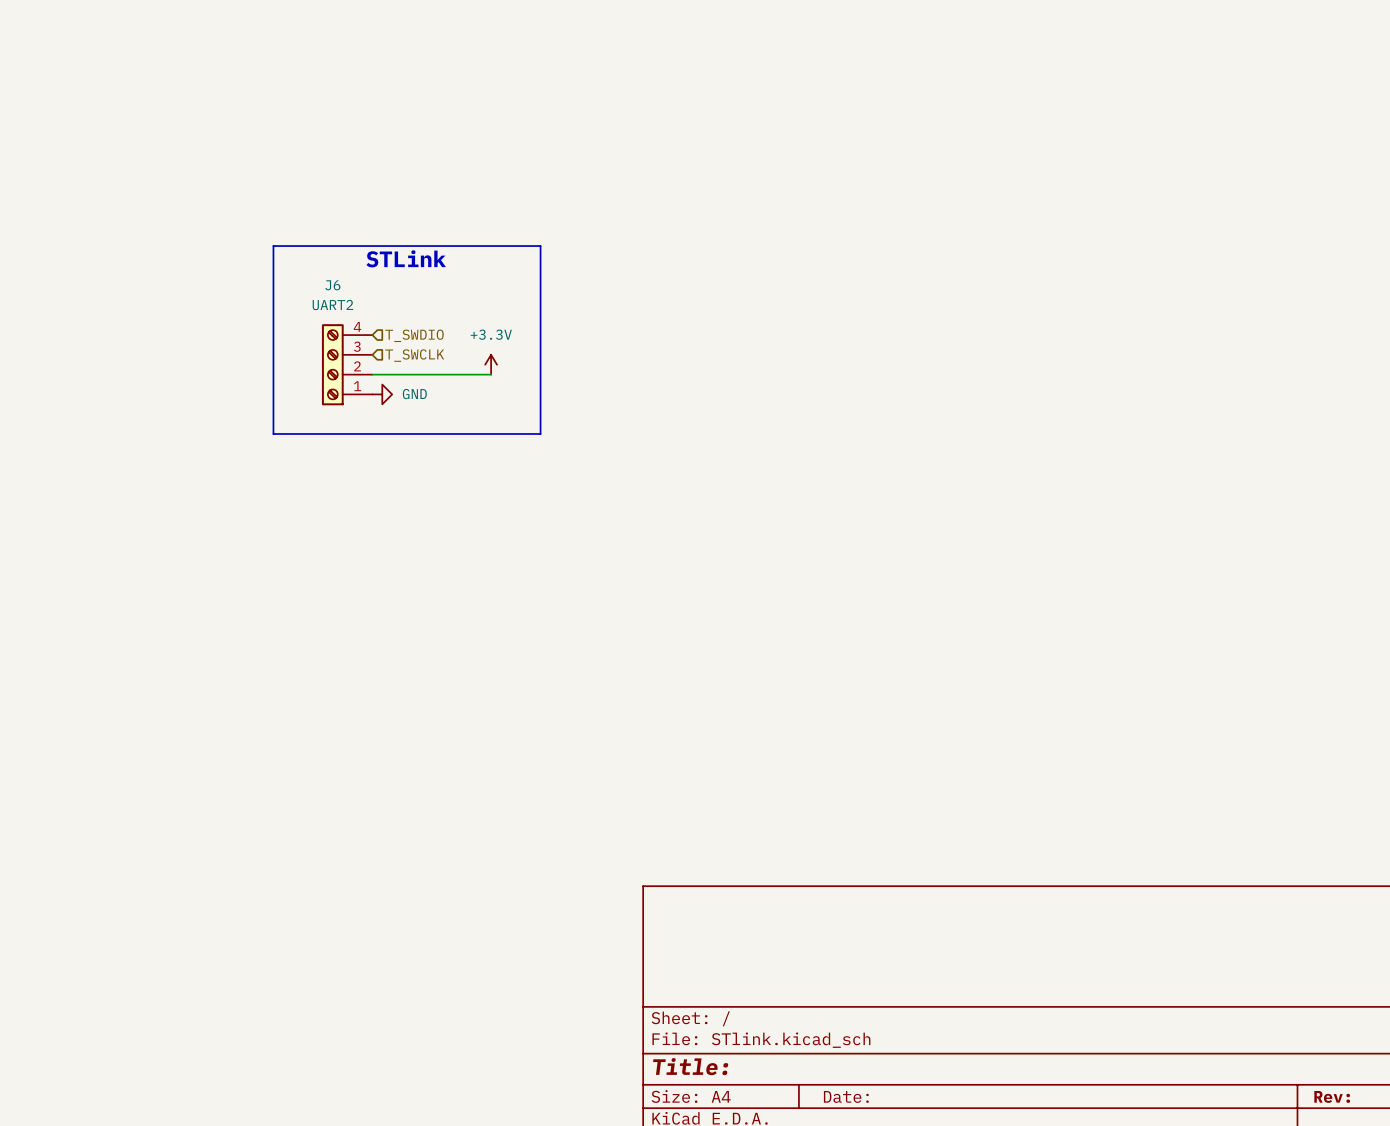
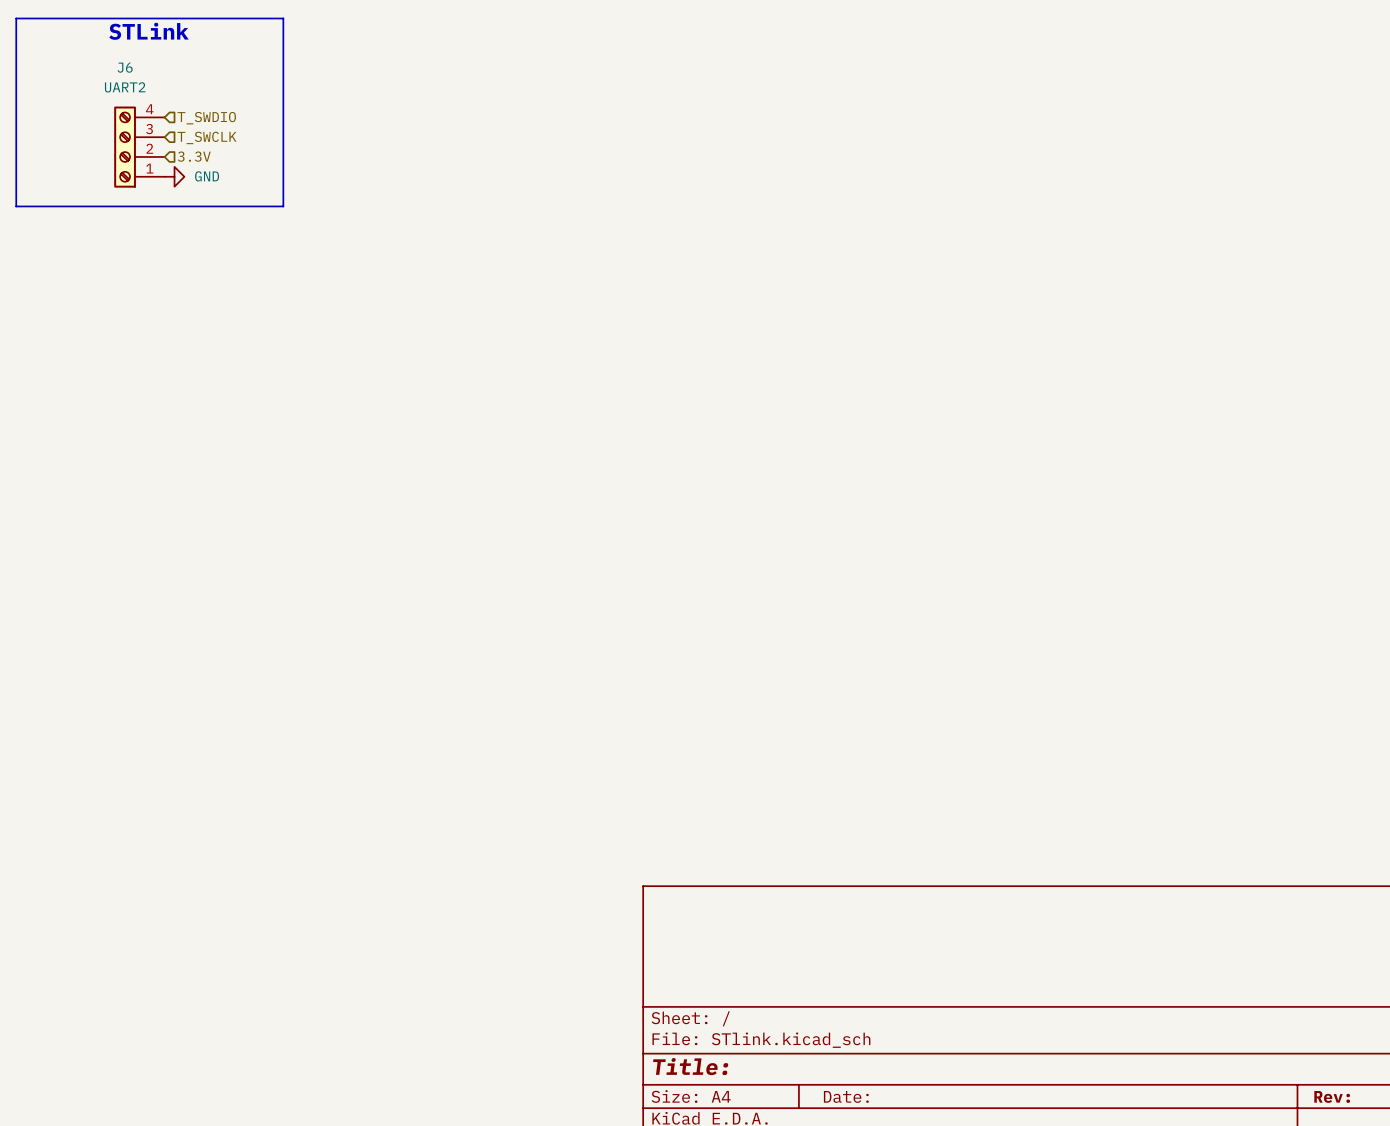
line: none -> (16, 18) (283, 18) (283, 206) (16, 206) (16, 18)
text: none -> STLink (149, 31)
hierarchical label: none -> T_SWDIO (206, 118)
hierarchical label: none -> T_SWCLK (206, 137)
hierarchical label: none -> 3.3V (194, 156)
power symbol: none -> GND (174, 176)
line: (273, 246) (540, 246) (540, 433) (273, 433) (273, 246) -> none
text: STLink (406, 258) -> none
hierarchical label: T_SWDIO (414, 335) -> none
hierarchical label: T_SWCLK (414, 355) -> none
J6 position: (347, 364) -> (139, 147)
power symbol: +3.3V (491, 364) -> none
wire: (372, 374) (491, 374) -> none
power symbol: GND (382, 394) -> none

